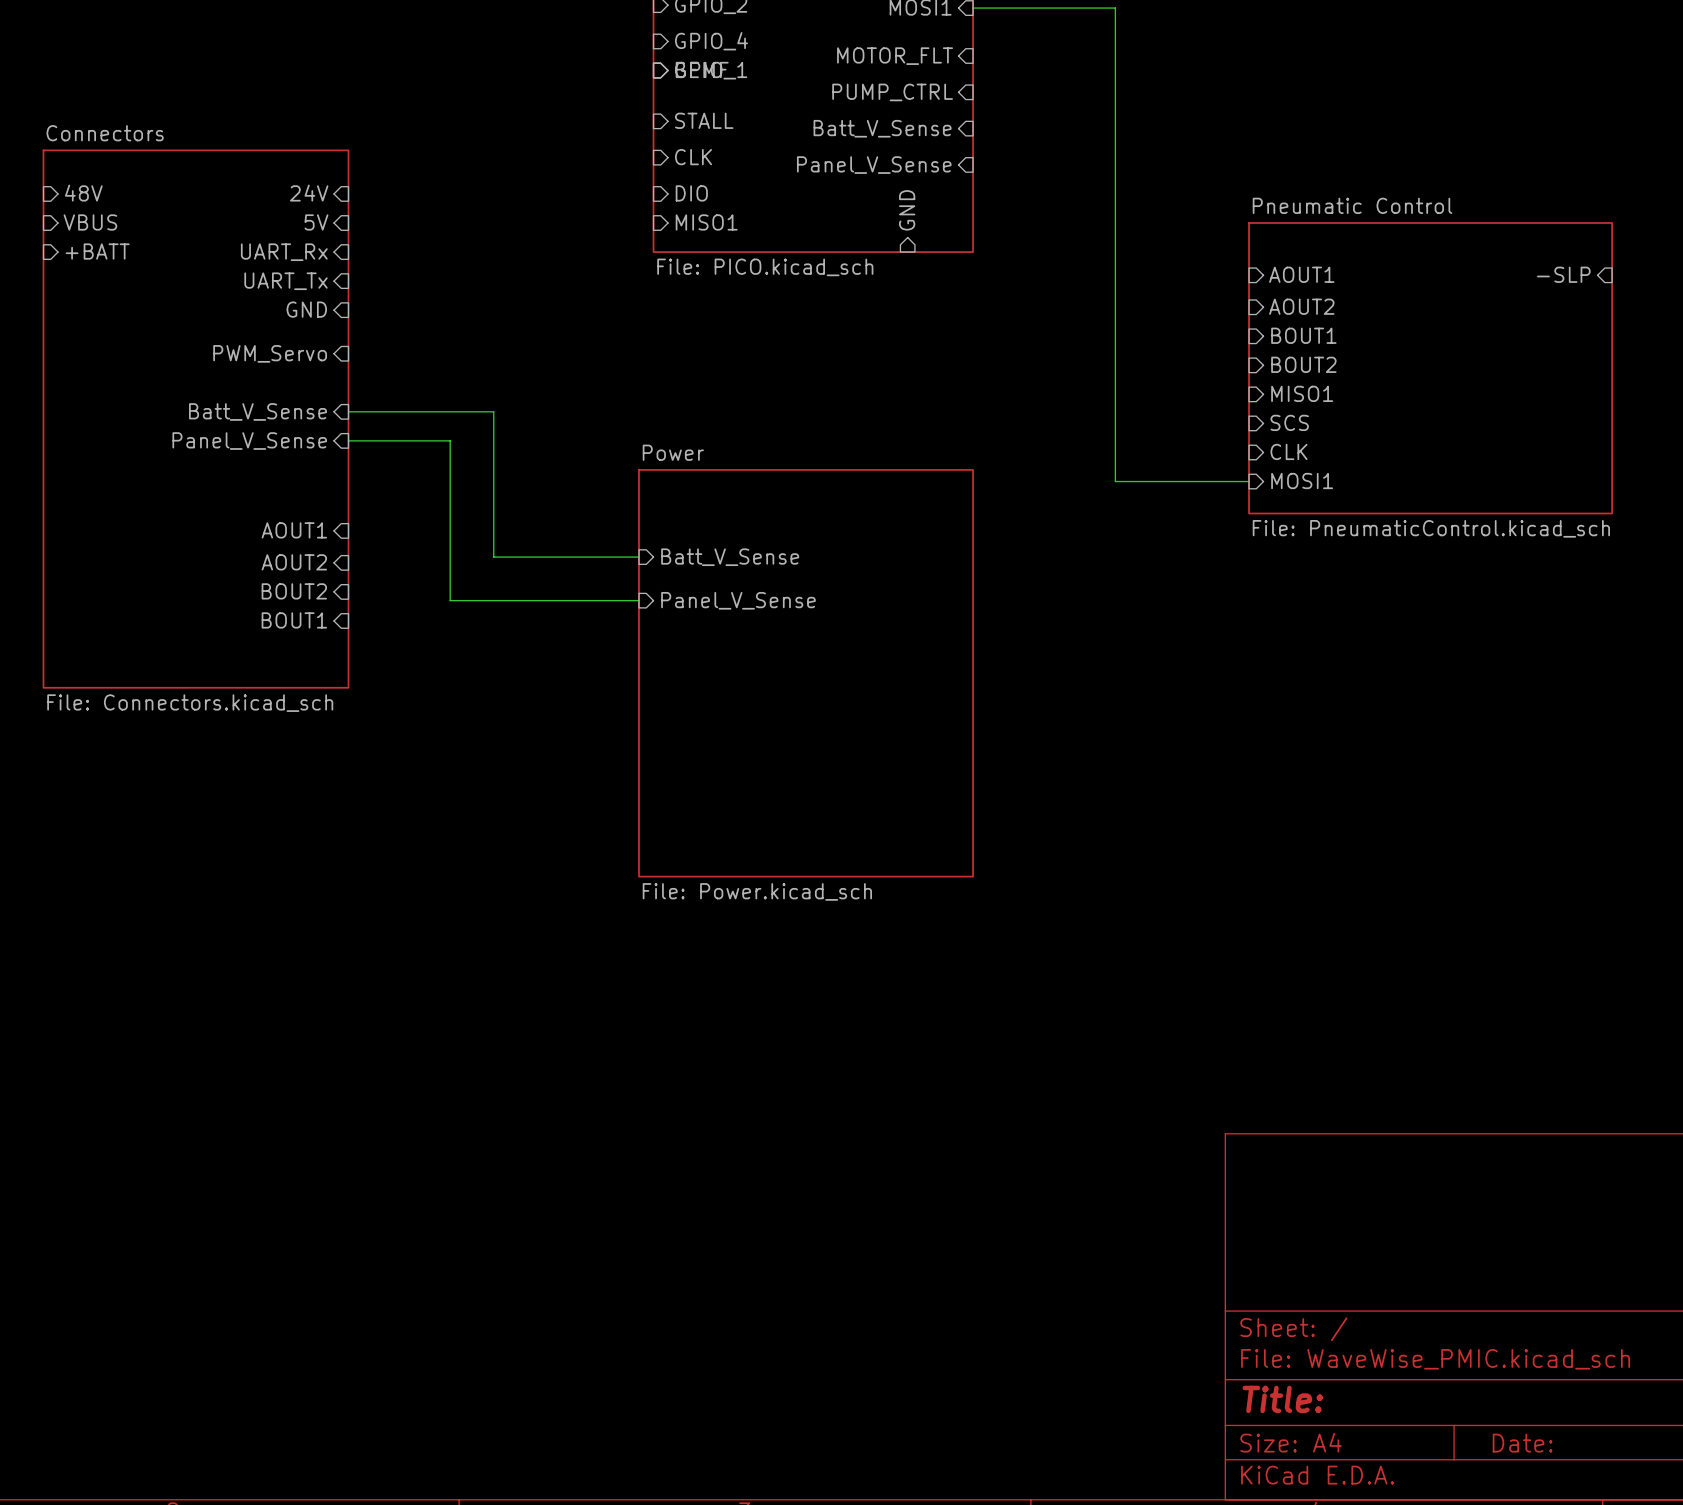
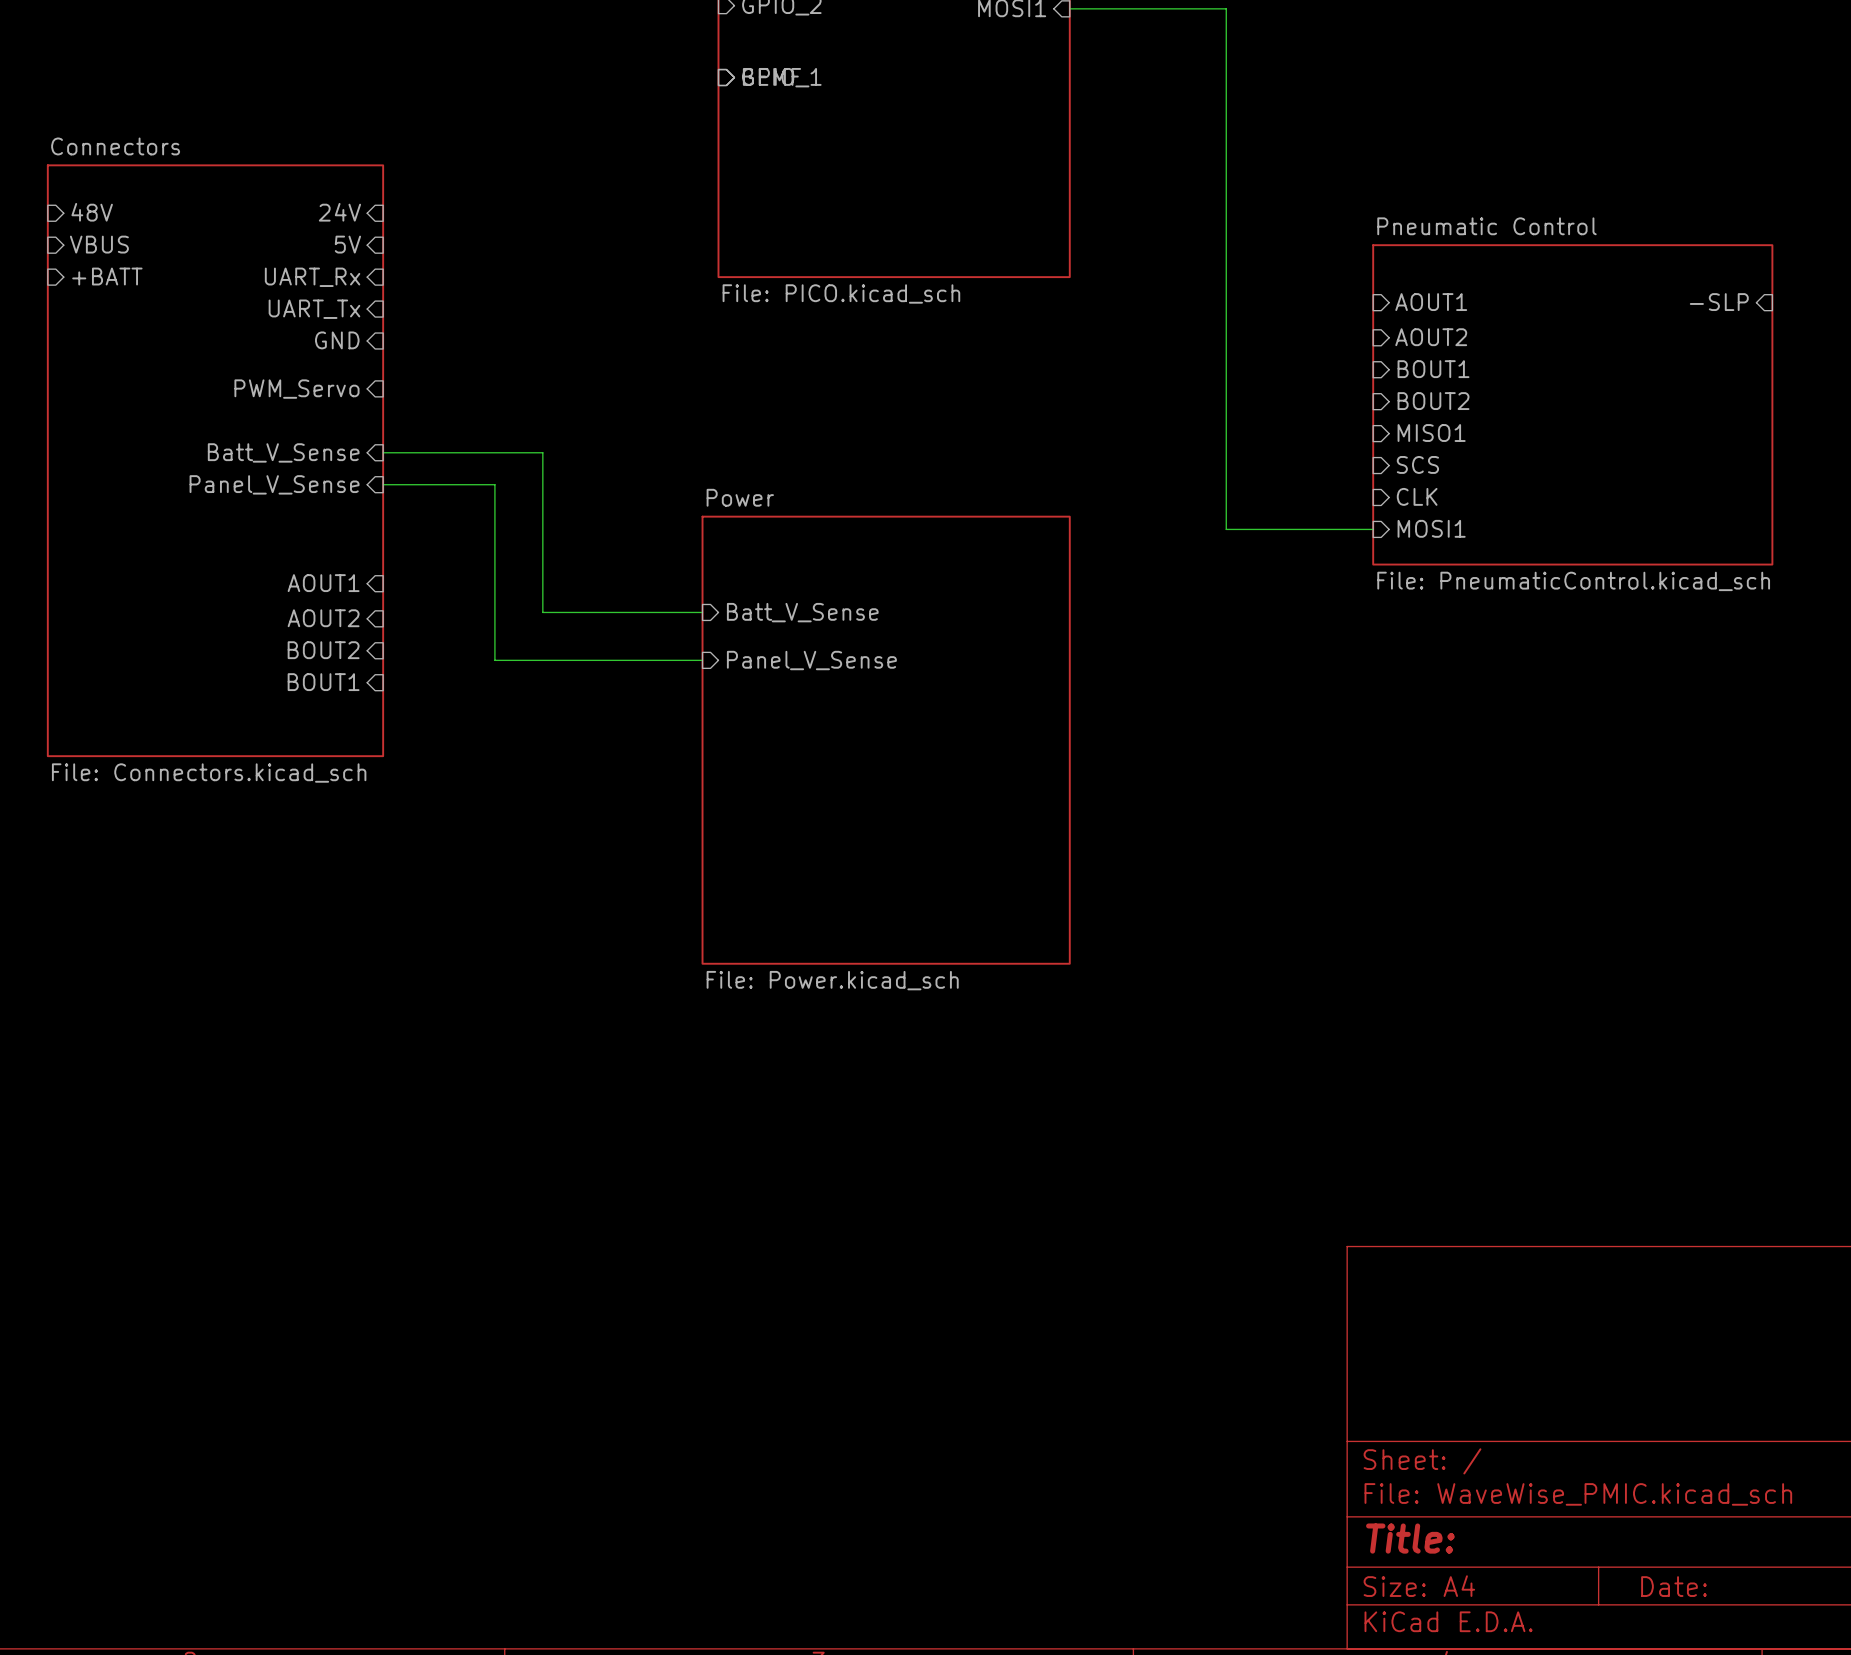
sheet pin: GPIO_4 (711, 41) -> none
sheet pin: MOTOR_FLT (895, 56) -> none
sheet pin: PUMP_CTRL (892, 92) -> none
sheet pin: STALL (704, 120) -> none
sheet pin: Batt_V_Sense (882, 128) -> none
sheet pin: CLK (693, 157) -> none
sheet pin: Panel_V_Sense (874, 165) -> none
sheet pin: DIO (691, 193) -> none
sheet pin: GND (907, 210) -> none
sheet pin: MISO1 (706, 222) -> none

